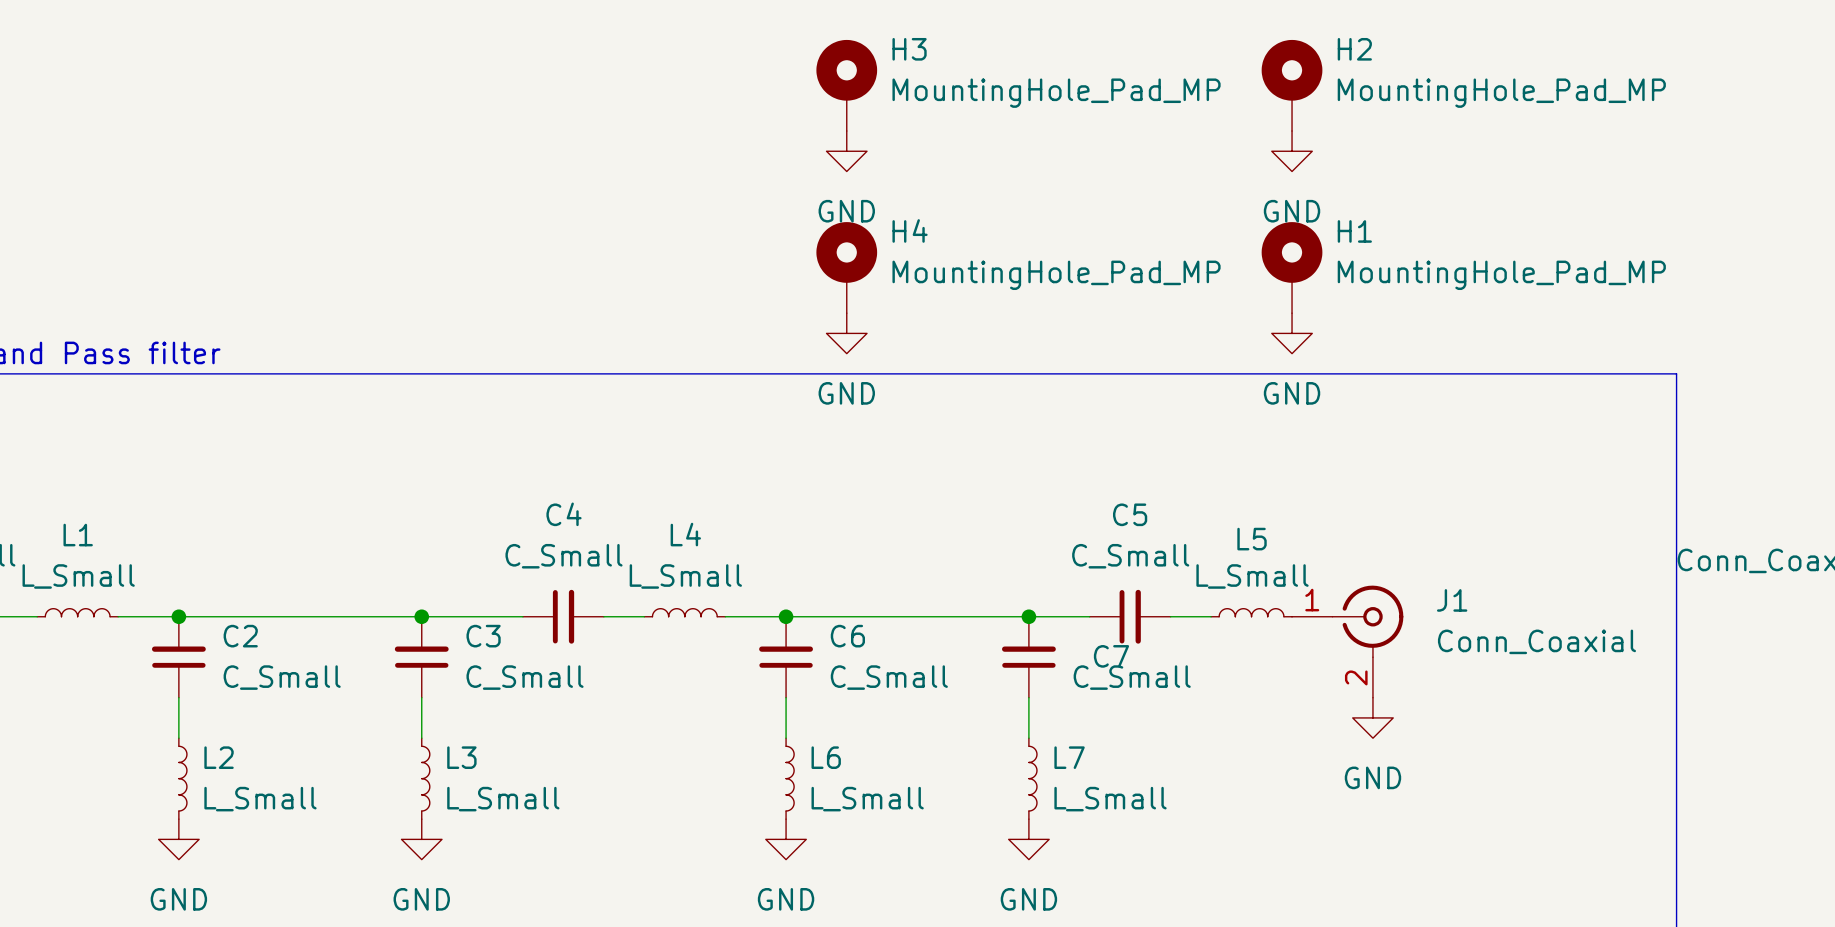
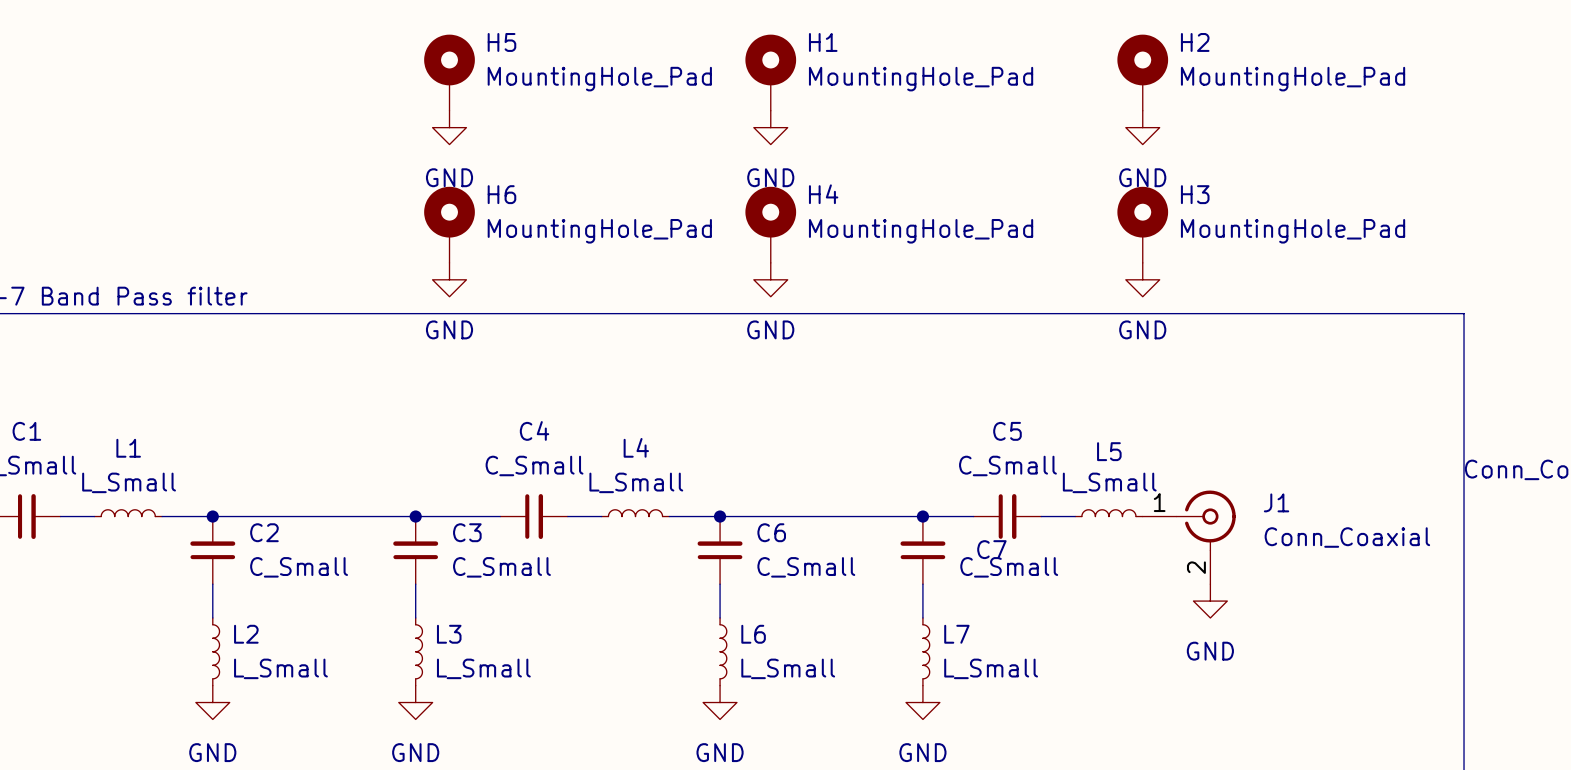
H3 name: H3 (909, 49) -> H1 (823, 42)
H5: none -> MountingHole_Pad (449, 72)
H3 value: MountingHole_Pad_MP (1056, 93) -> MountingHole_Pad (921, 79)
H2 value: MountingHole_Pad_MP (1501, 93) -> MountingHole_Pad (1293, 79)
power symbol: none -> GND (449, 127)
H1 name: H1 (1354, 231) -> H3 (1195, 194)
H6: none -> MountingHole_Pad (449, 224)
H4 value: MountingHole_Pad_MP (1056, 275) -> MountingHole_Pad (921, 231)
H1 value: MountingHole_Pad_MP (1501, 275) -> MountingHole_Pad (1293, 231)
power symbol: none -> GND (449, 279)

